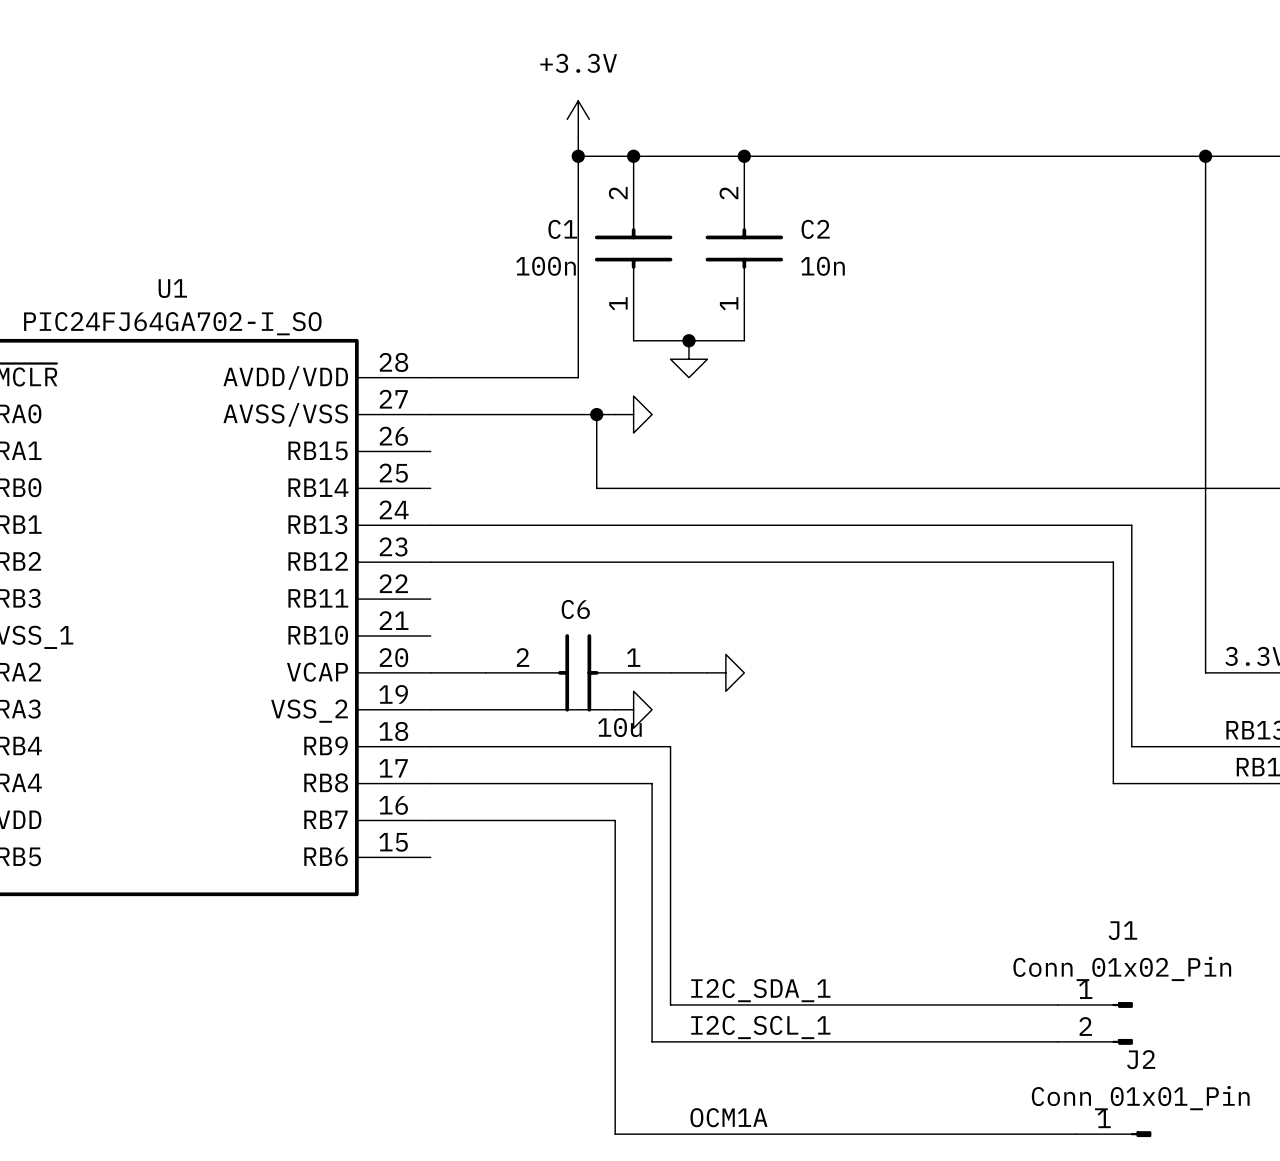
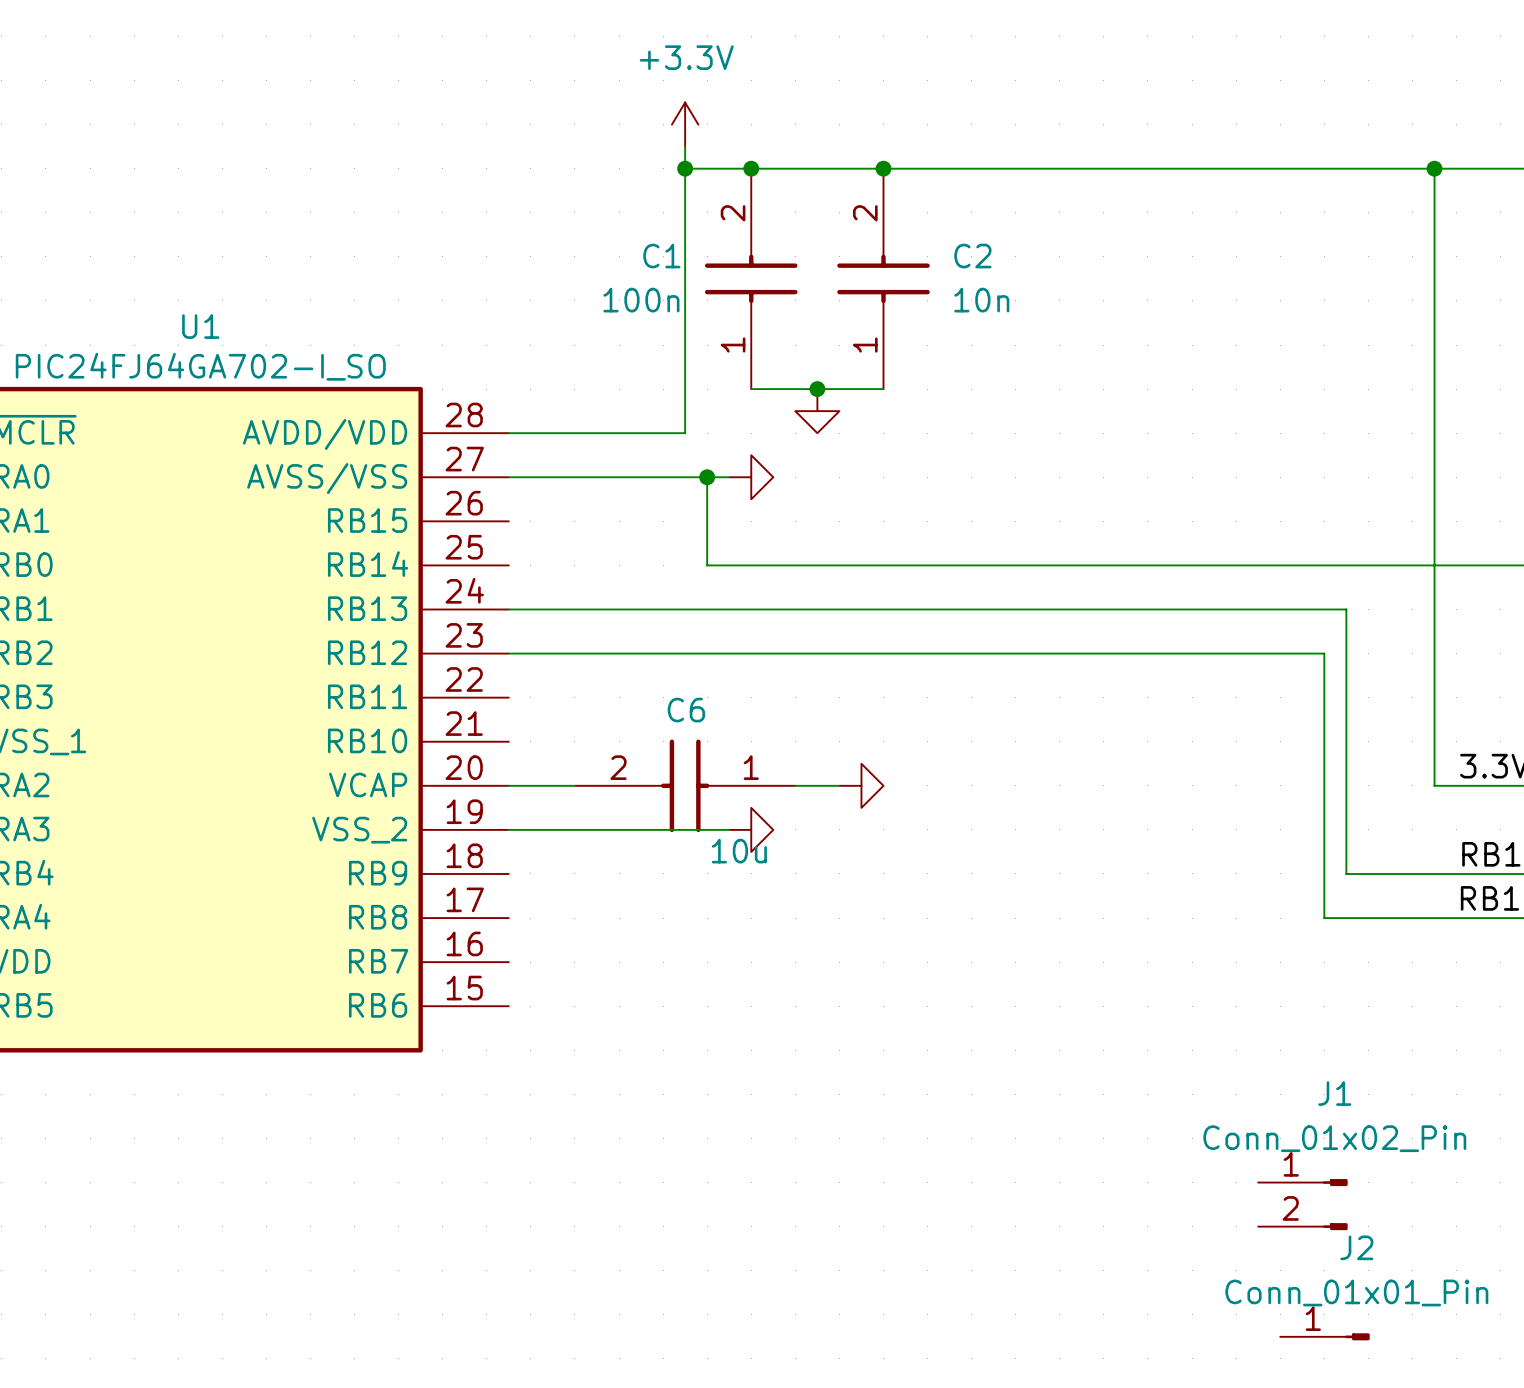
wire: (430, 746) (670, 746) (670, 1004) (1057, 1004) -> none
wire: (430, 783) (652, 783) (652, 1041) (1057, 1041) -> none
wire: (430, 820) (615, 820) (615, 1134) (1076, 1134) -> none
label: I2C_SDA_1 (760, 990) -> none
label: I2C_SCL_1 (760, 1027) -> none
label: OCM1A (728, 1117) -> none

